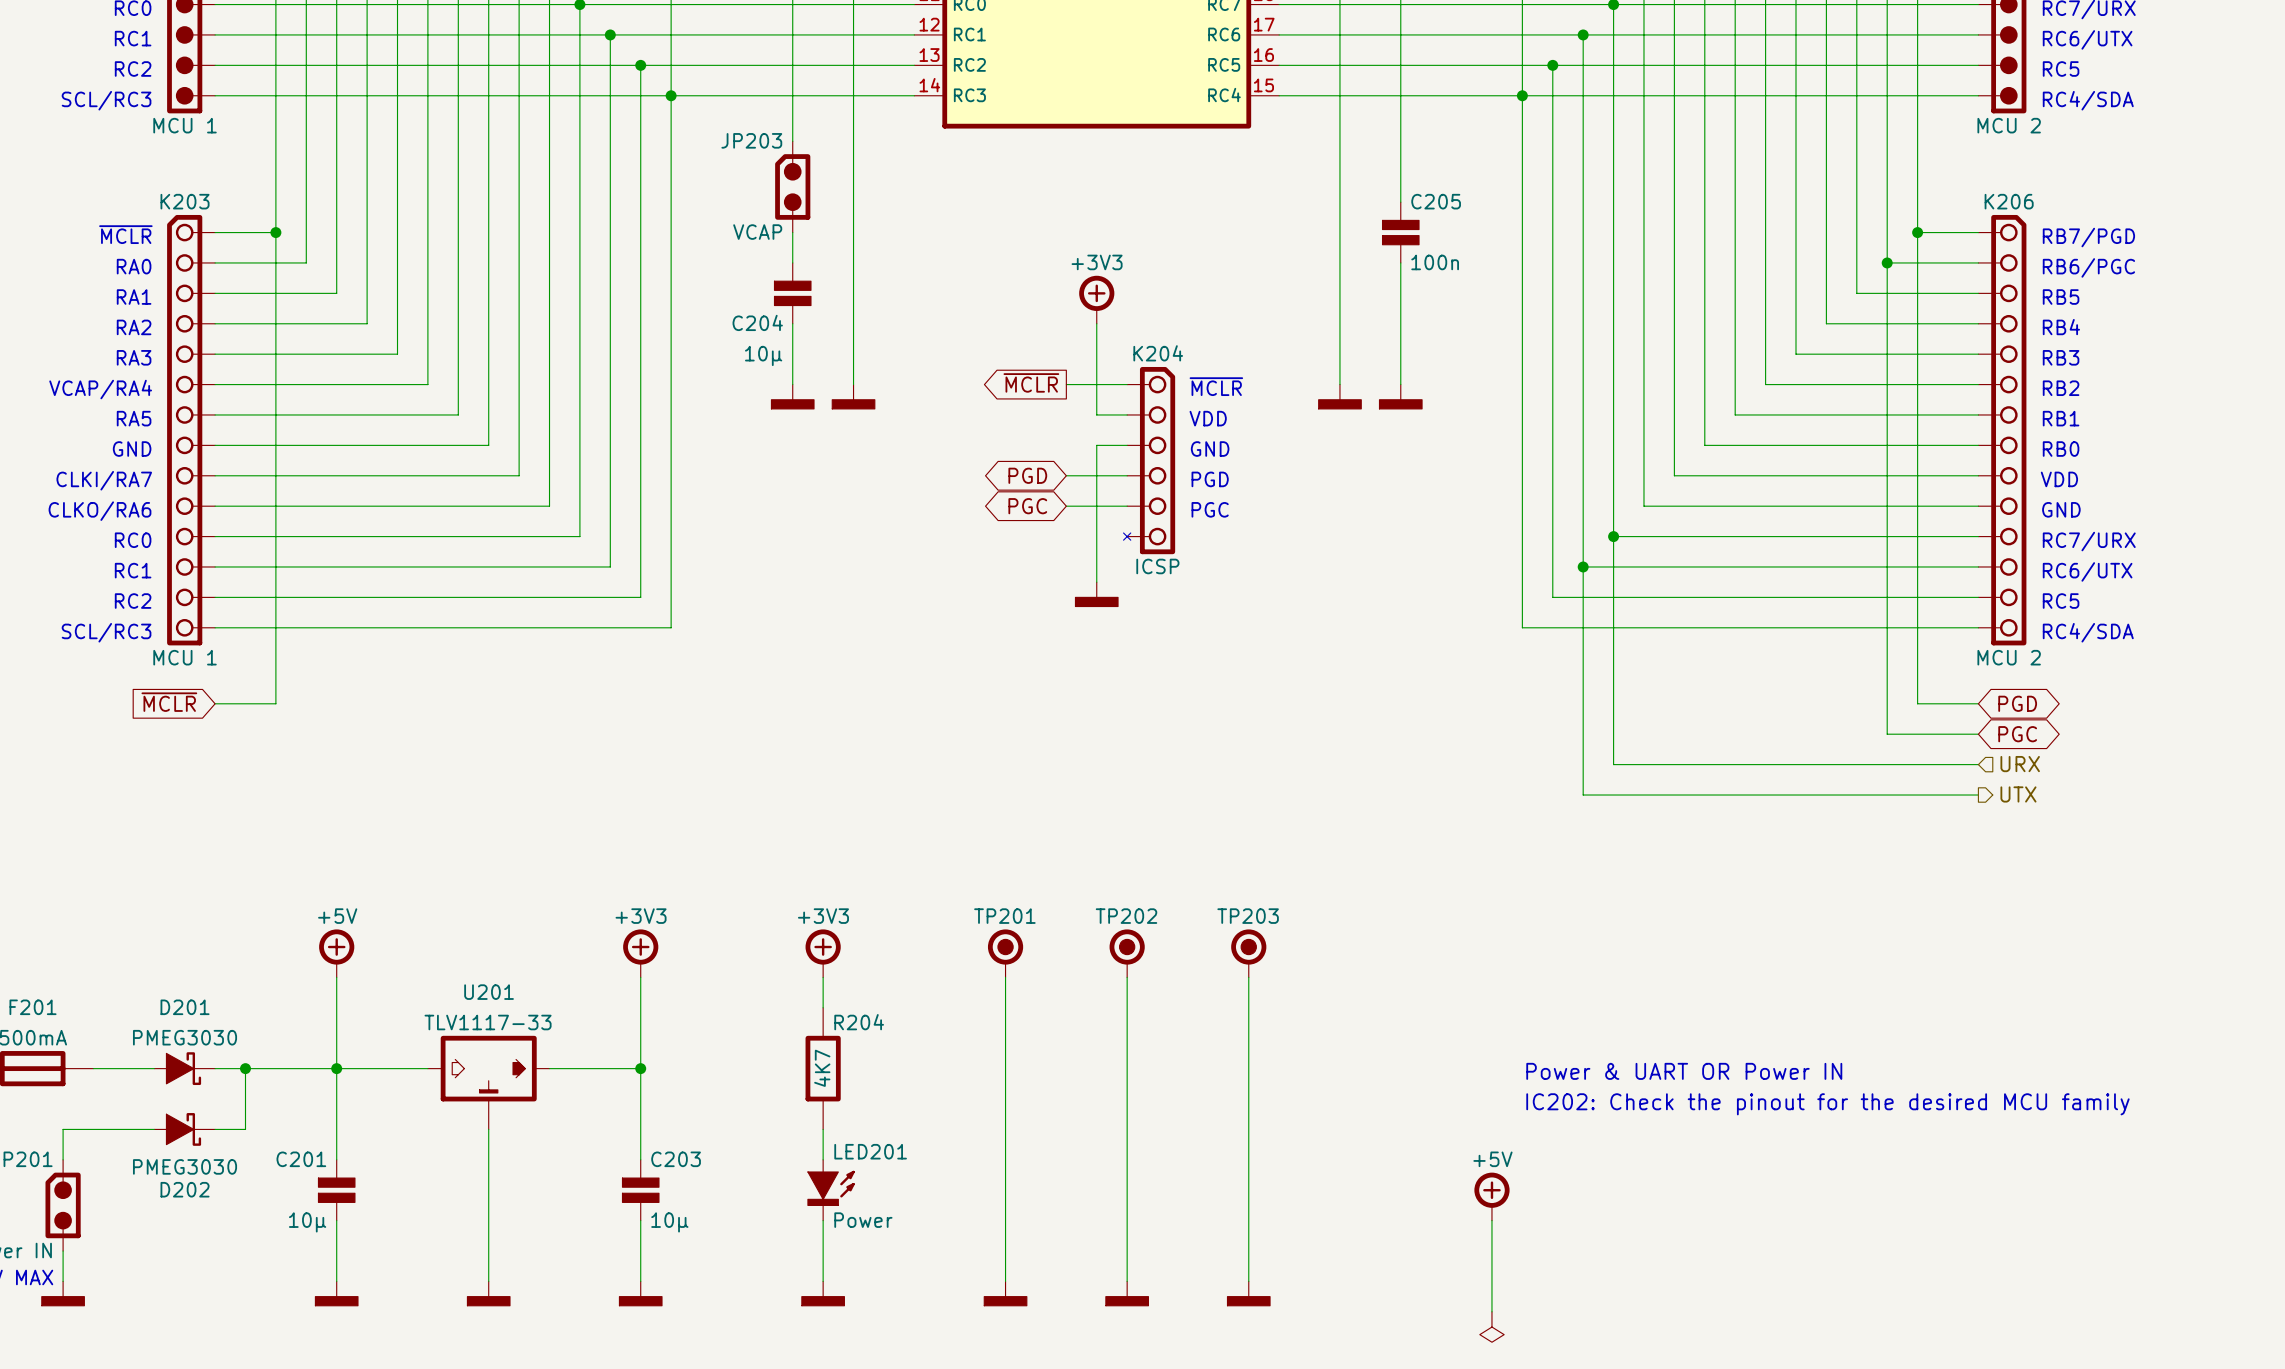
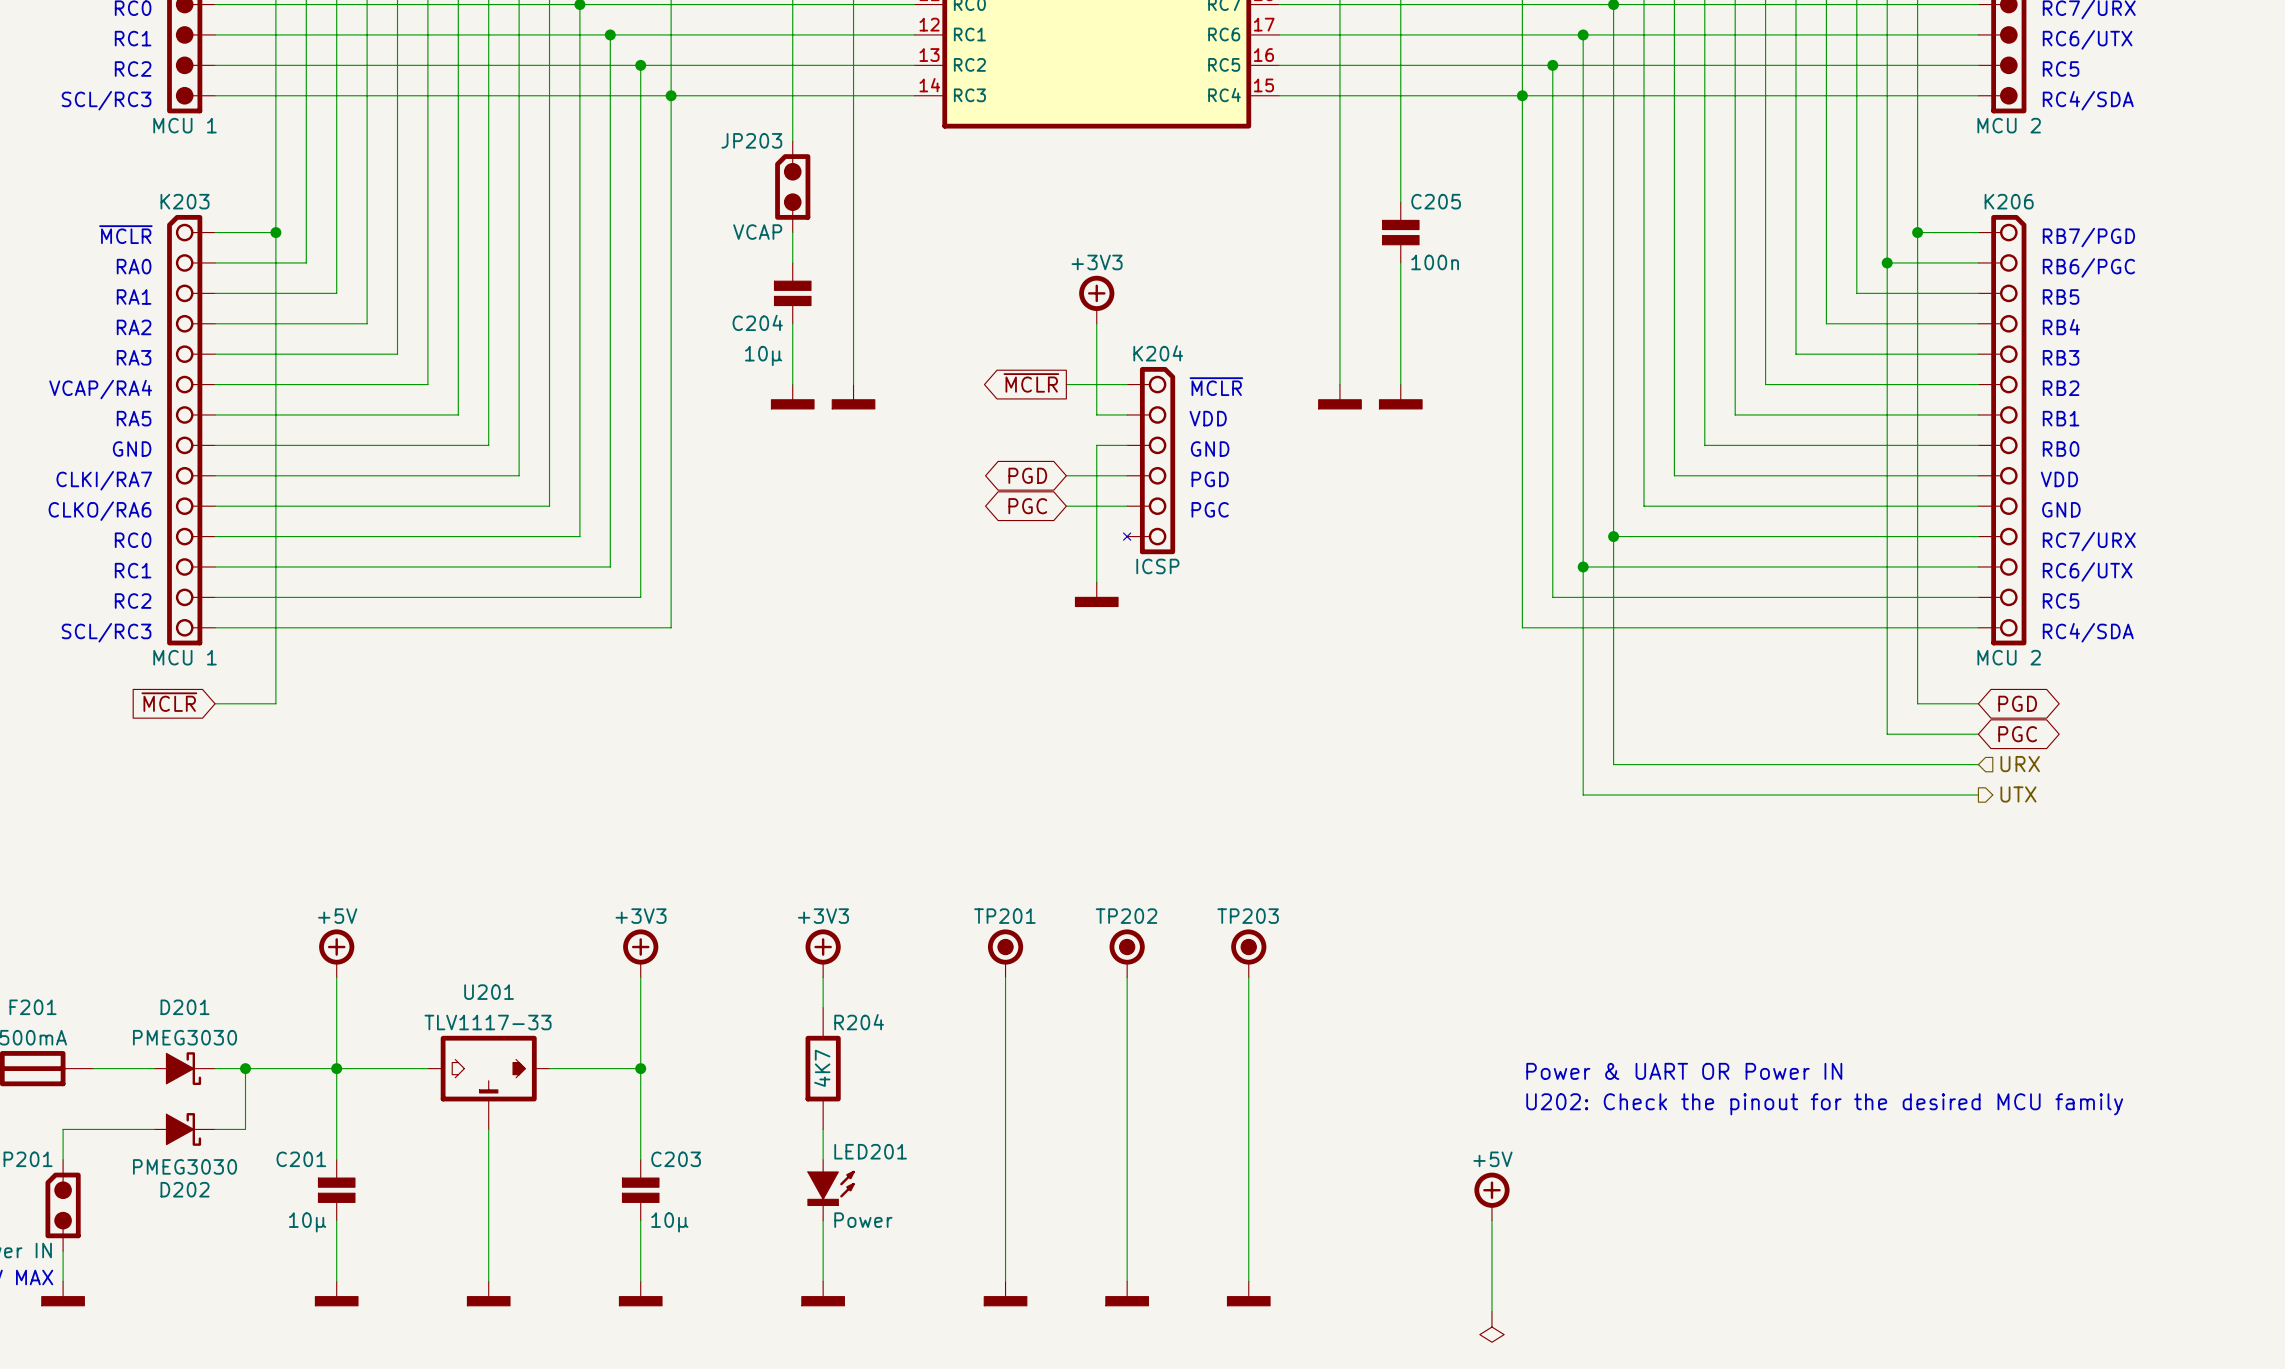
text: IC202: Check the pinout for the desired MCU family (1827, 1104) -> U202: Check the pinout for the desired MCU family (1824, 1104)

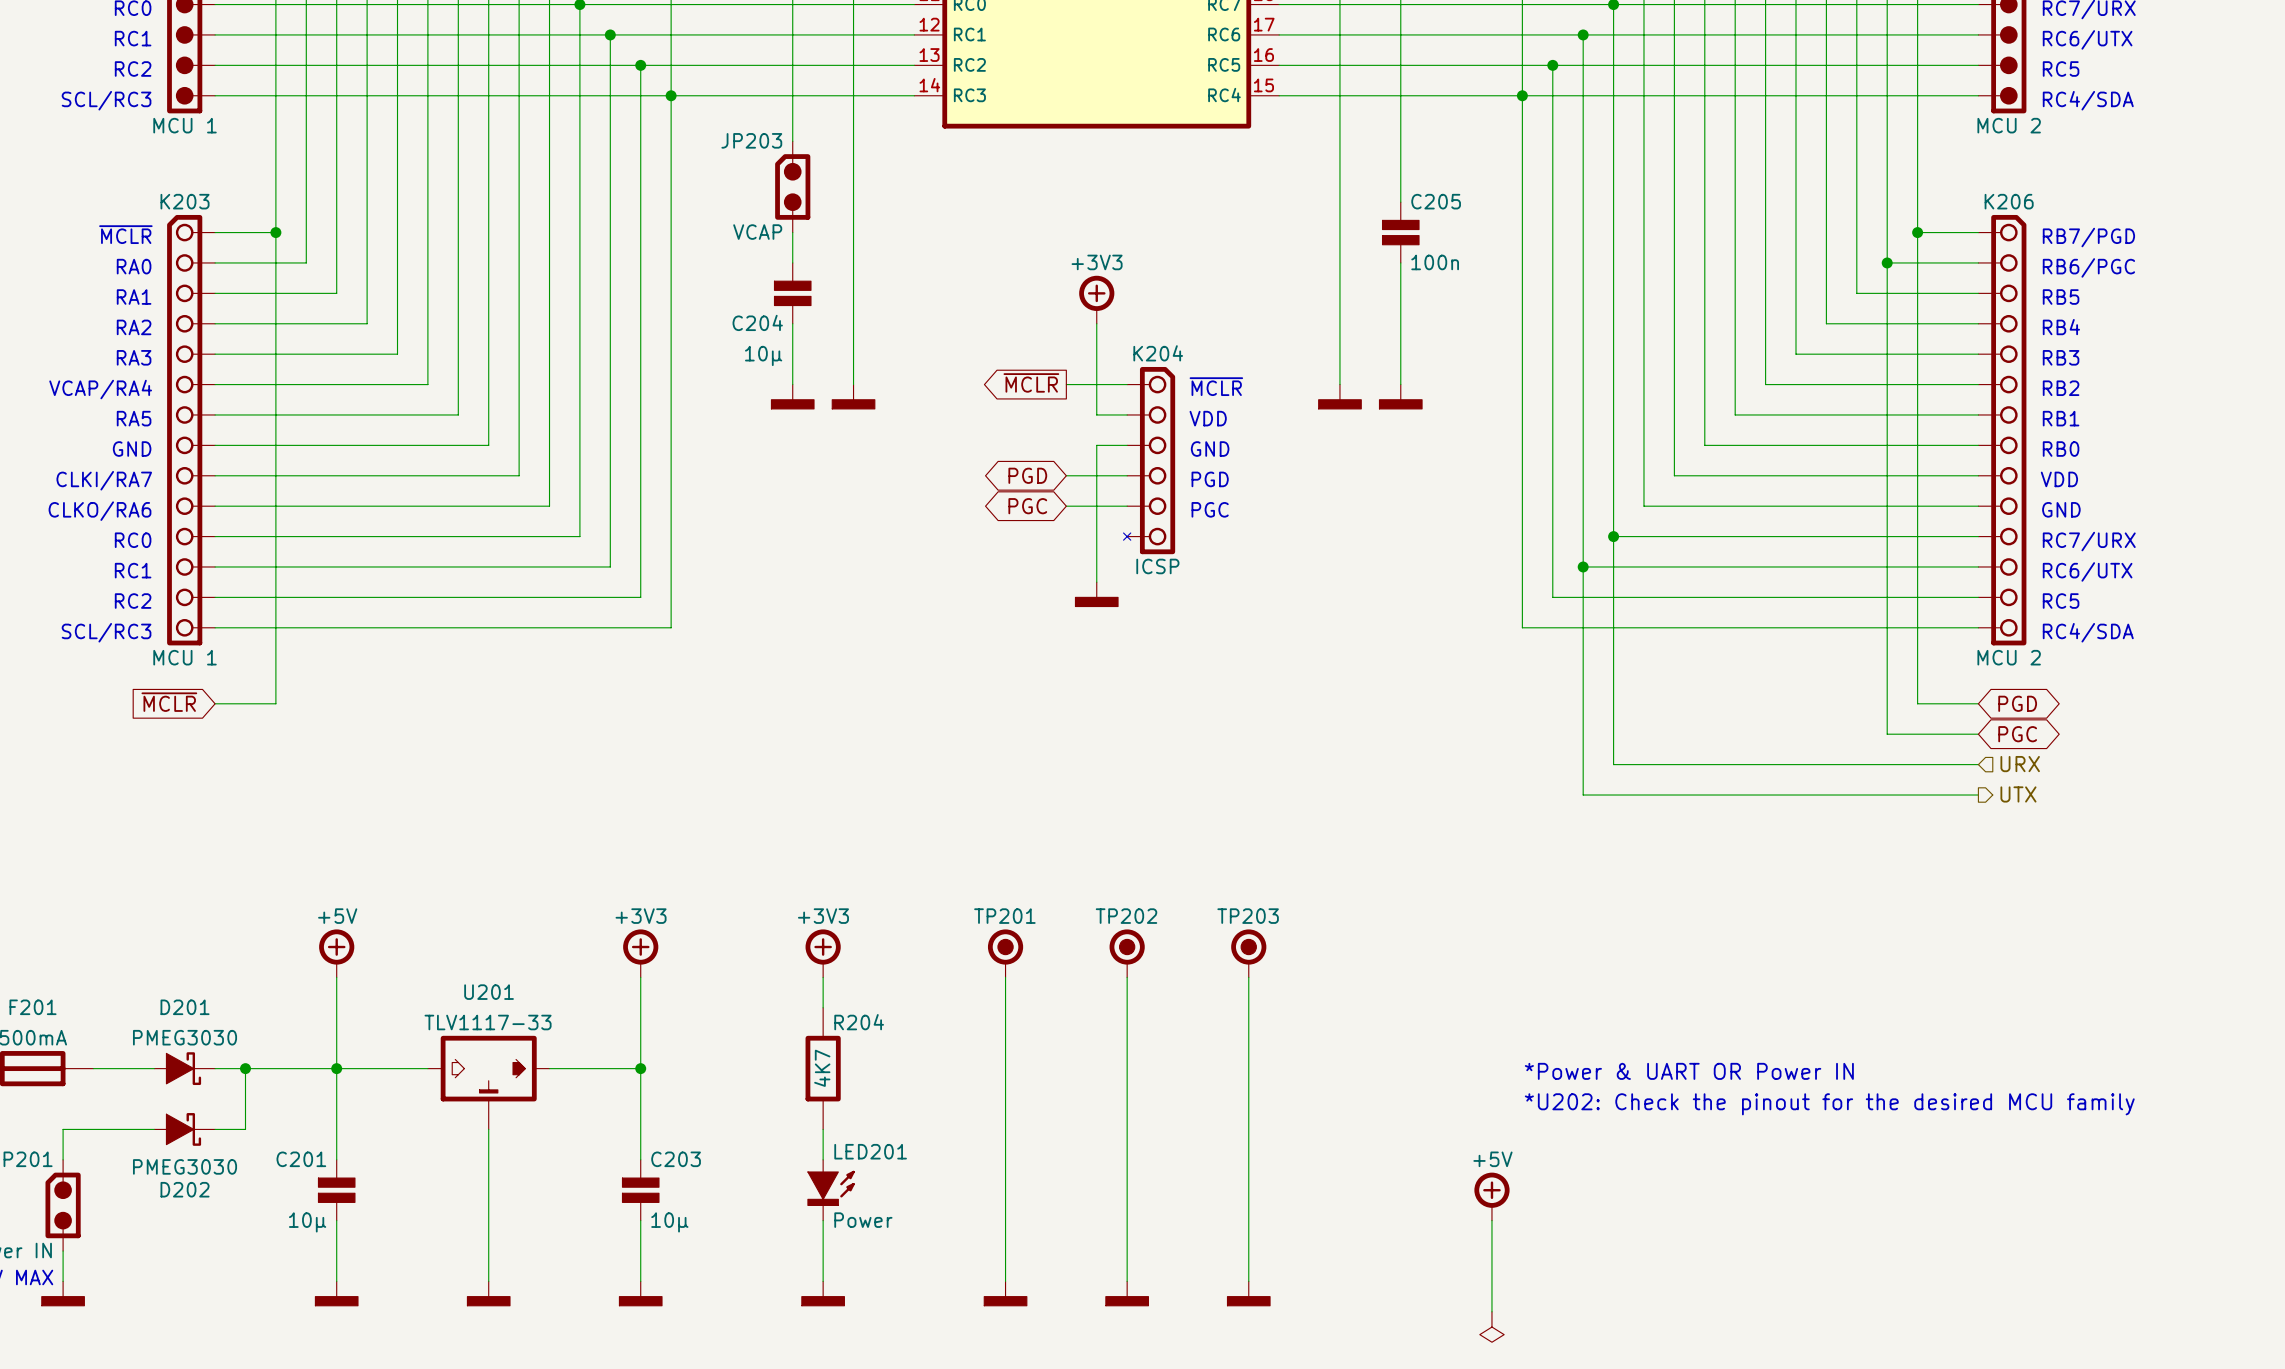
text: Power & UART OR Power IN (1684, 1071) -> *Power & UART OR Power IN (1689, 1071)
text: U202: Check the pinout for the desired MCU family (1824, 1104) -> *U202: Check the pinout for the desired MCU family (1829, 1104)

